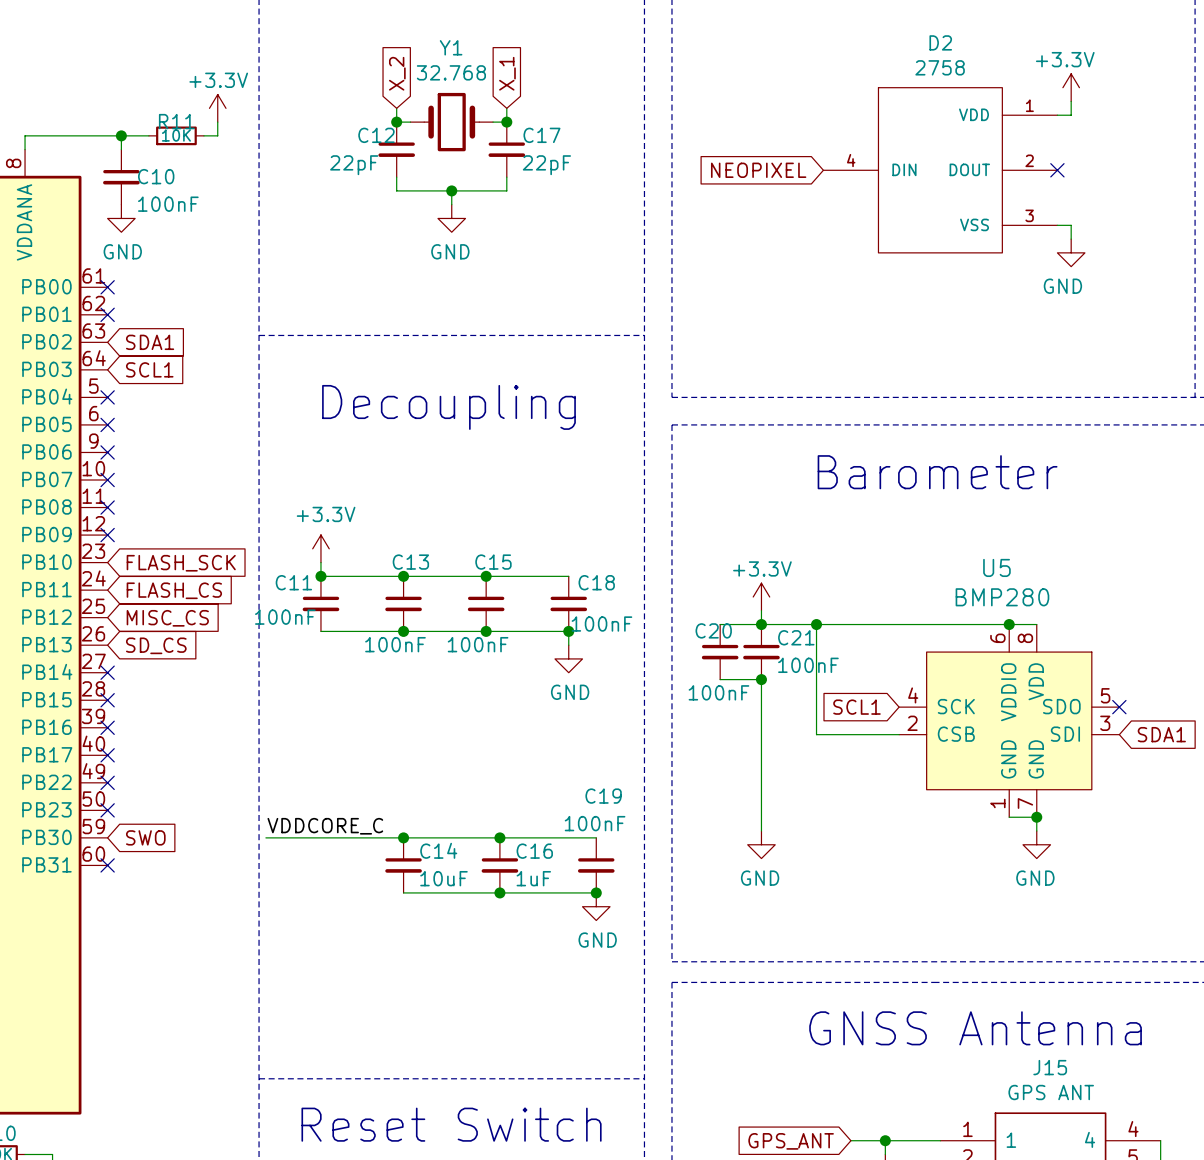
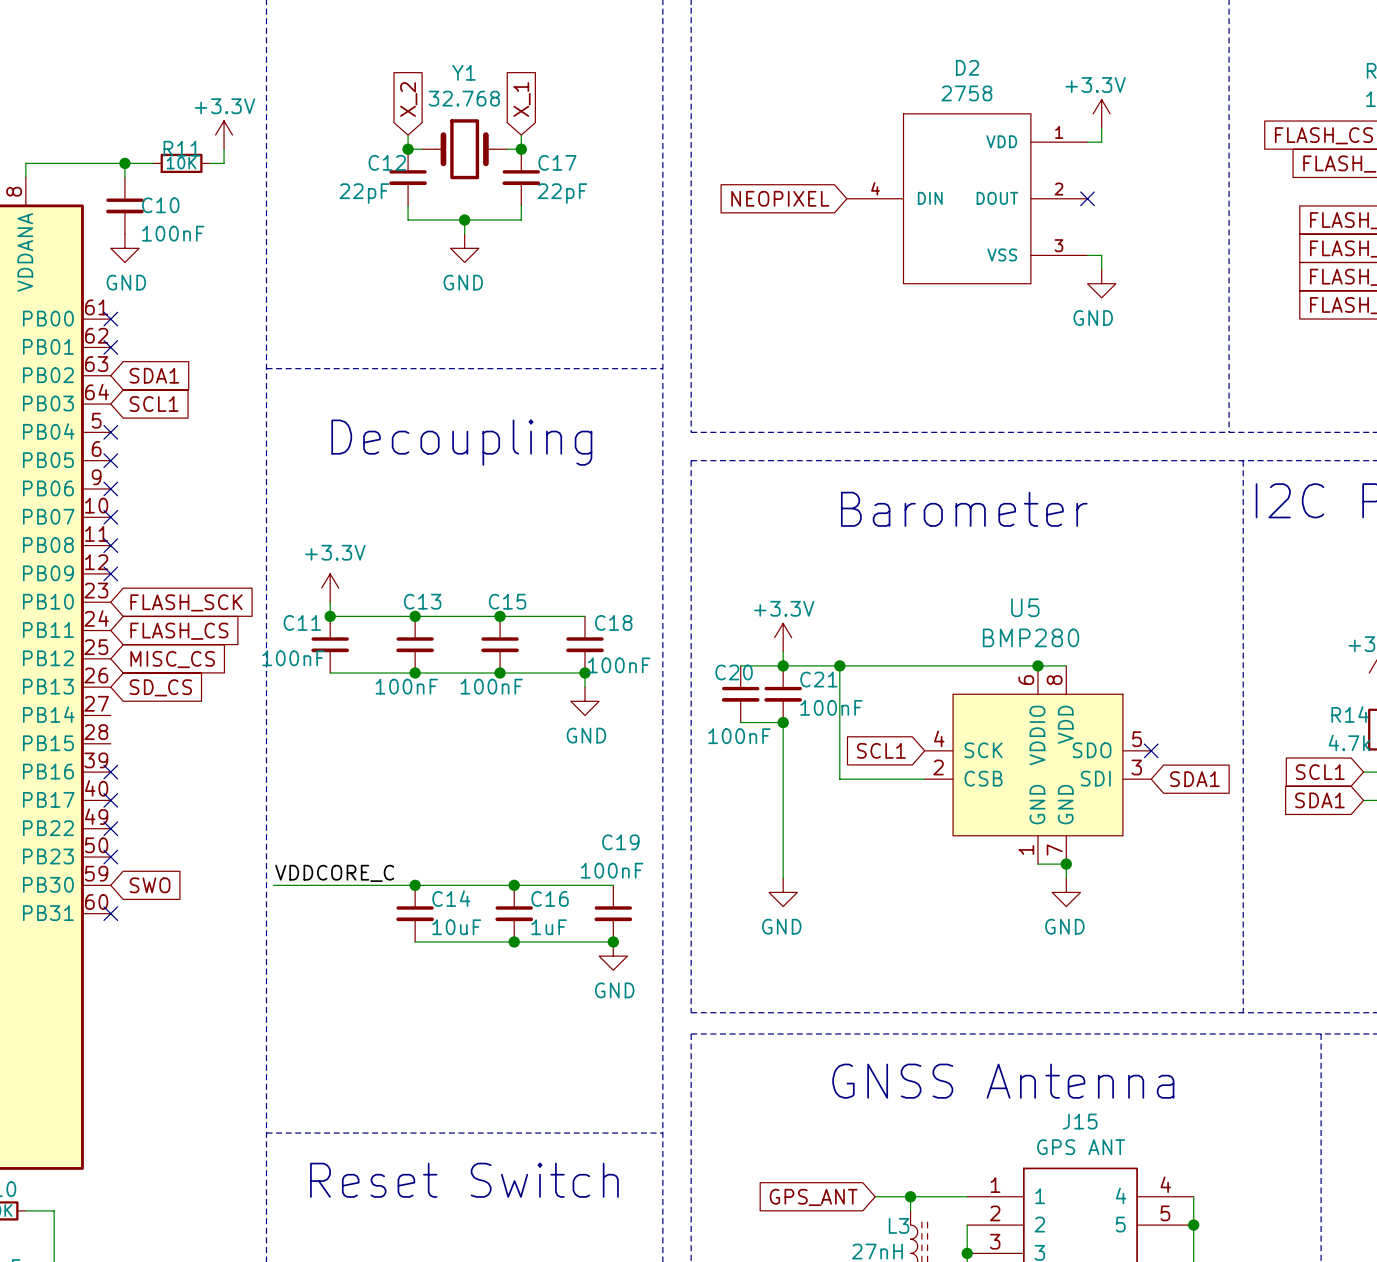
no-connect mark: (107, 672) -> none
no-connect mark: (107, 700) -> none

